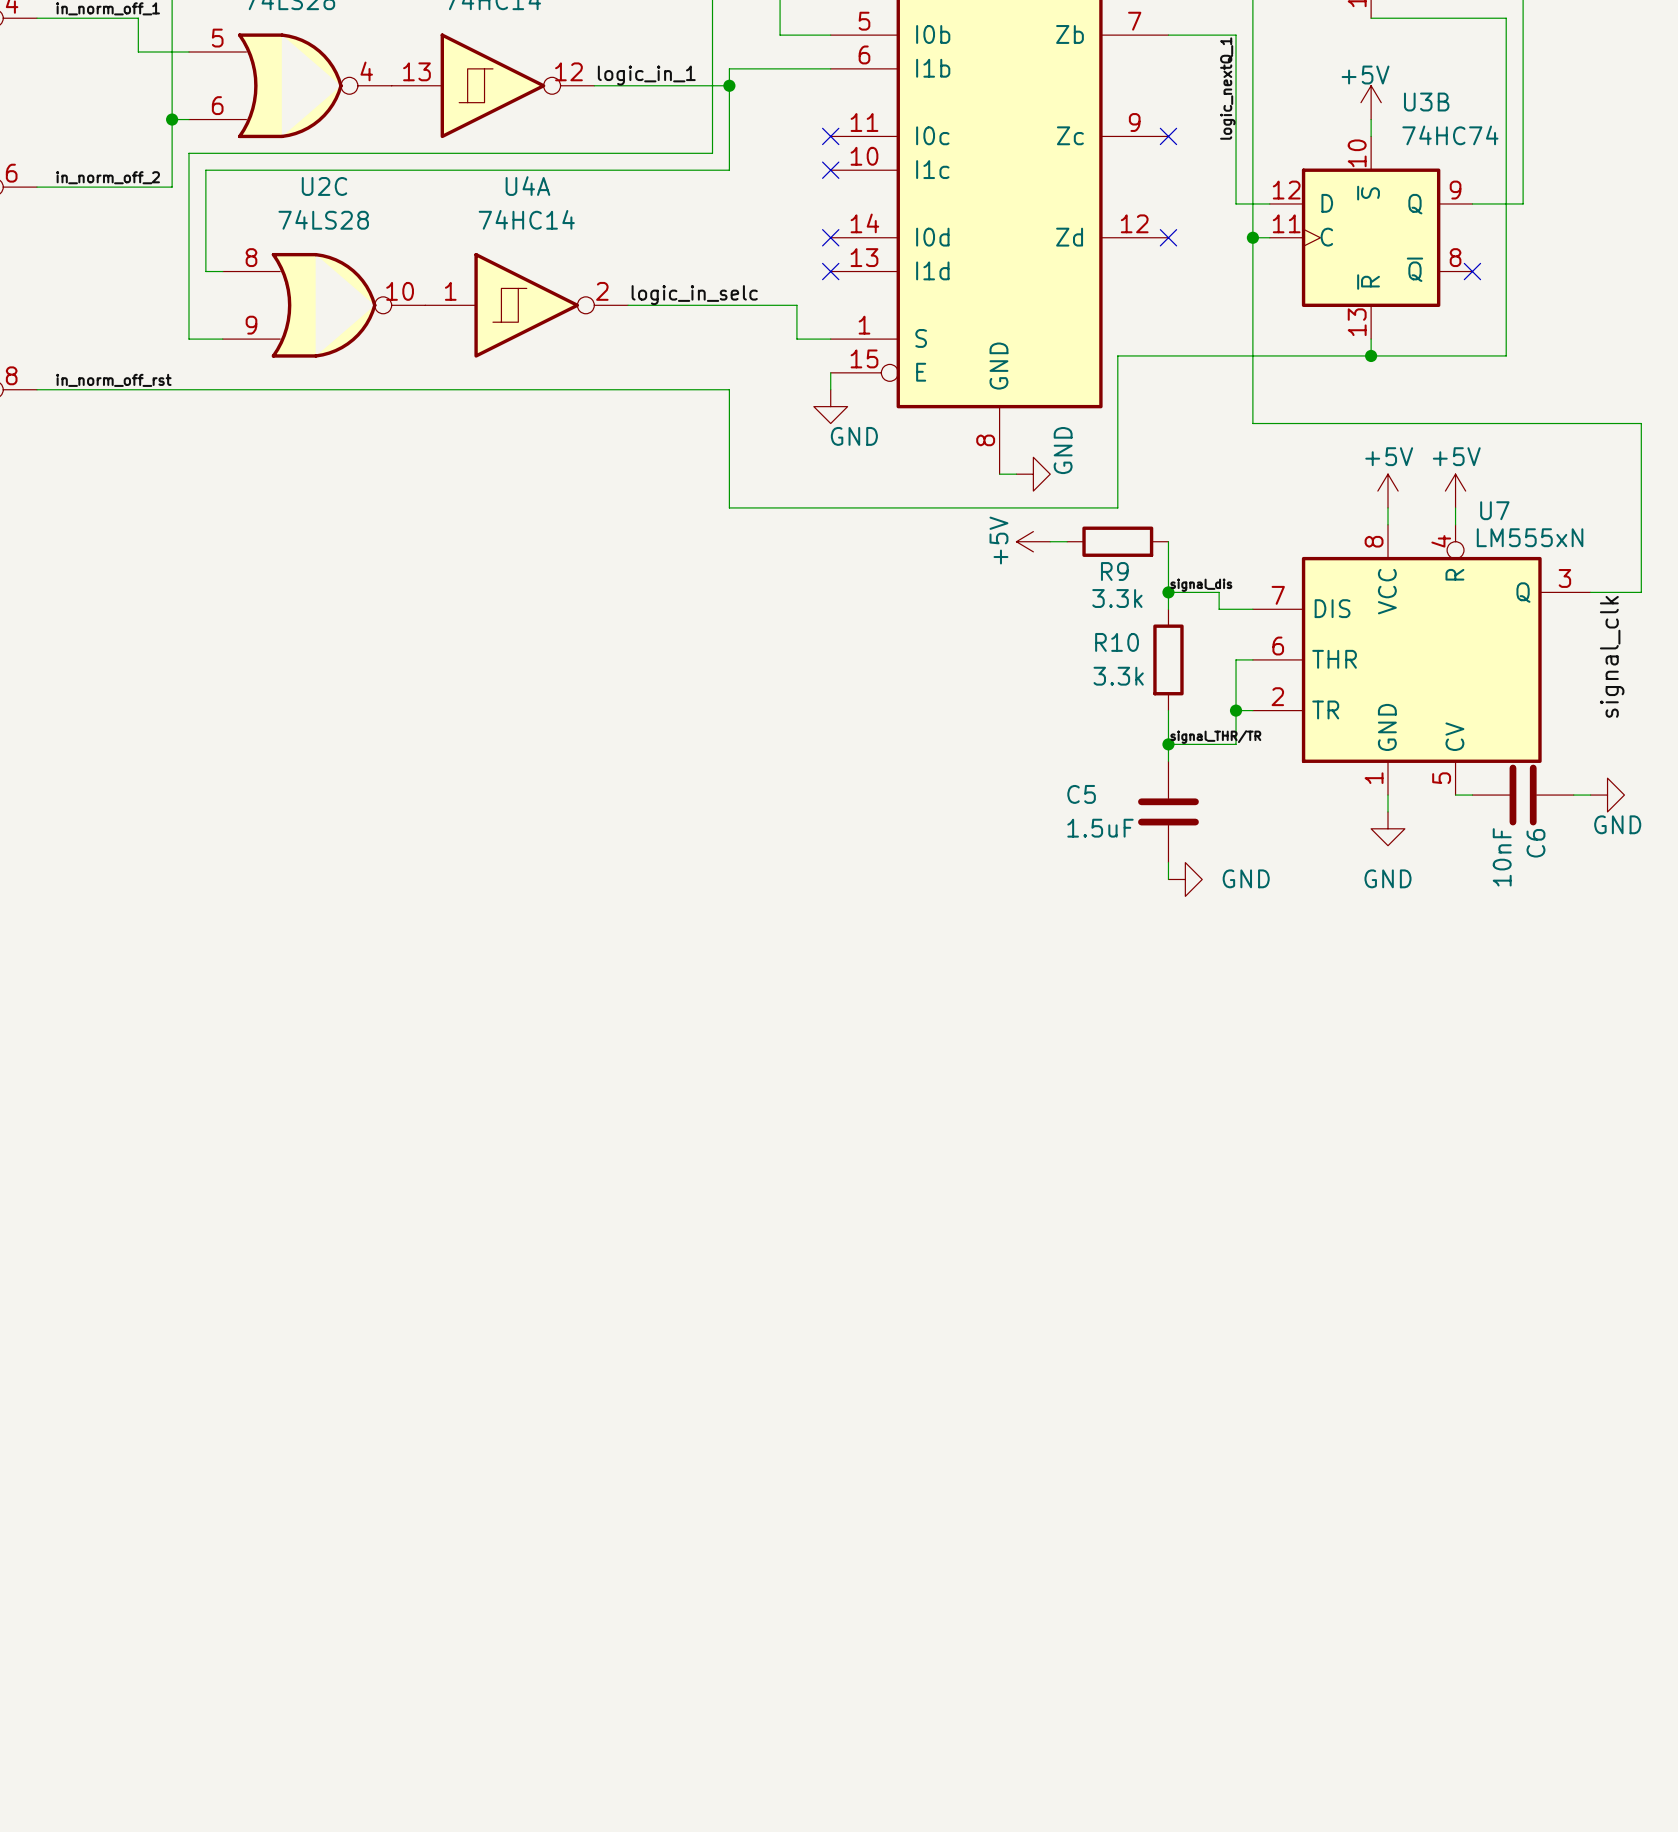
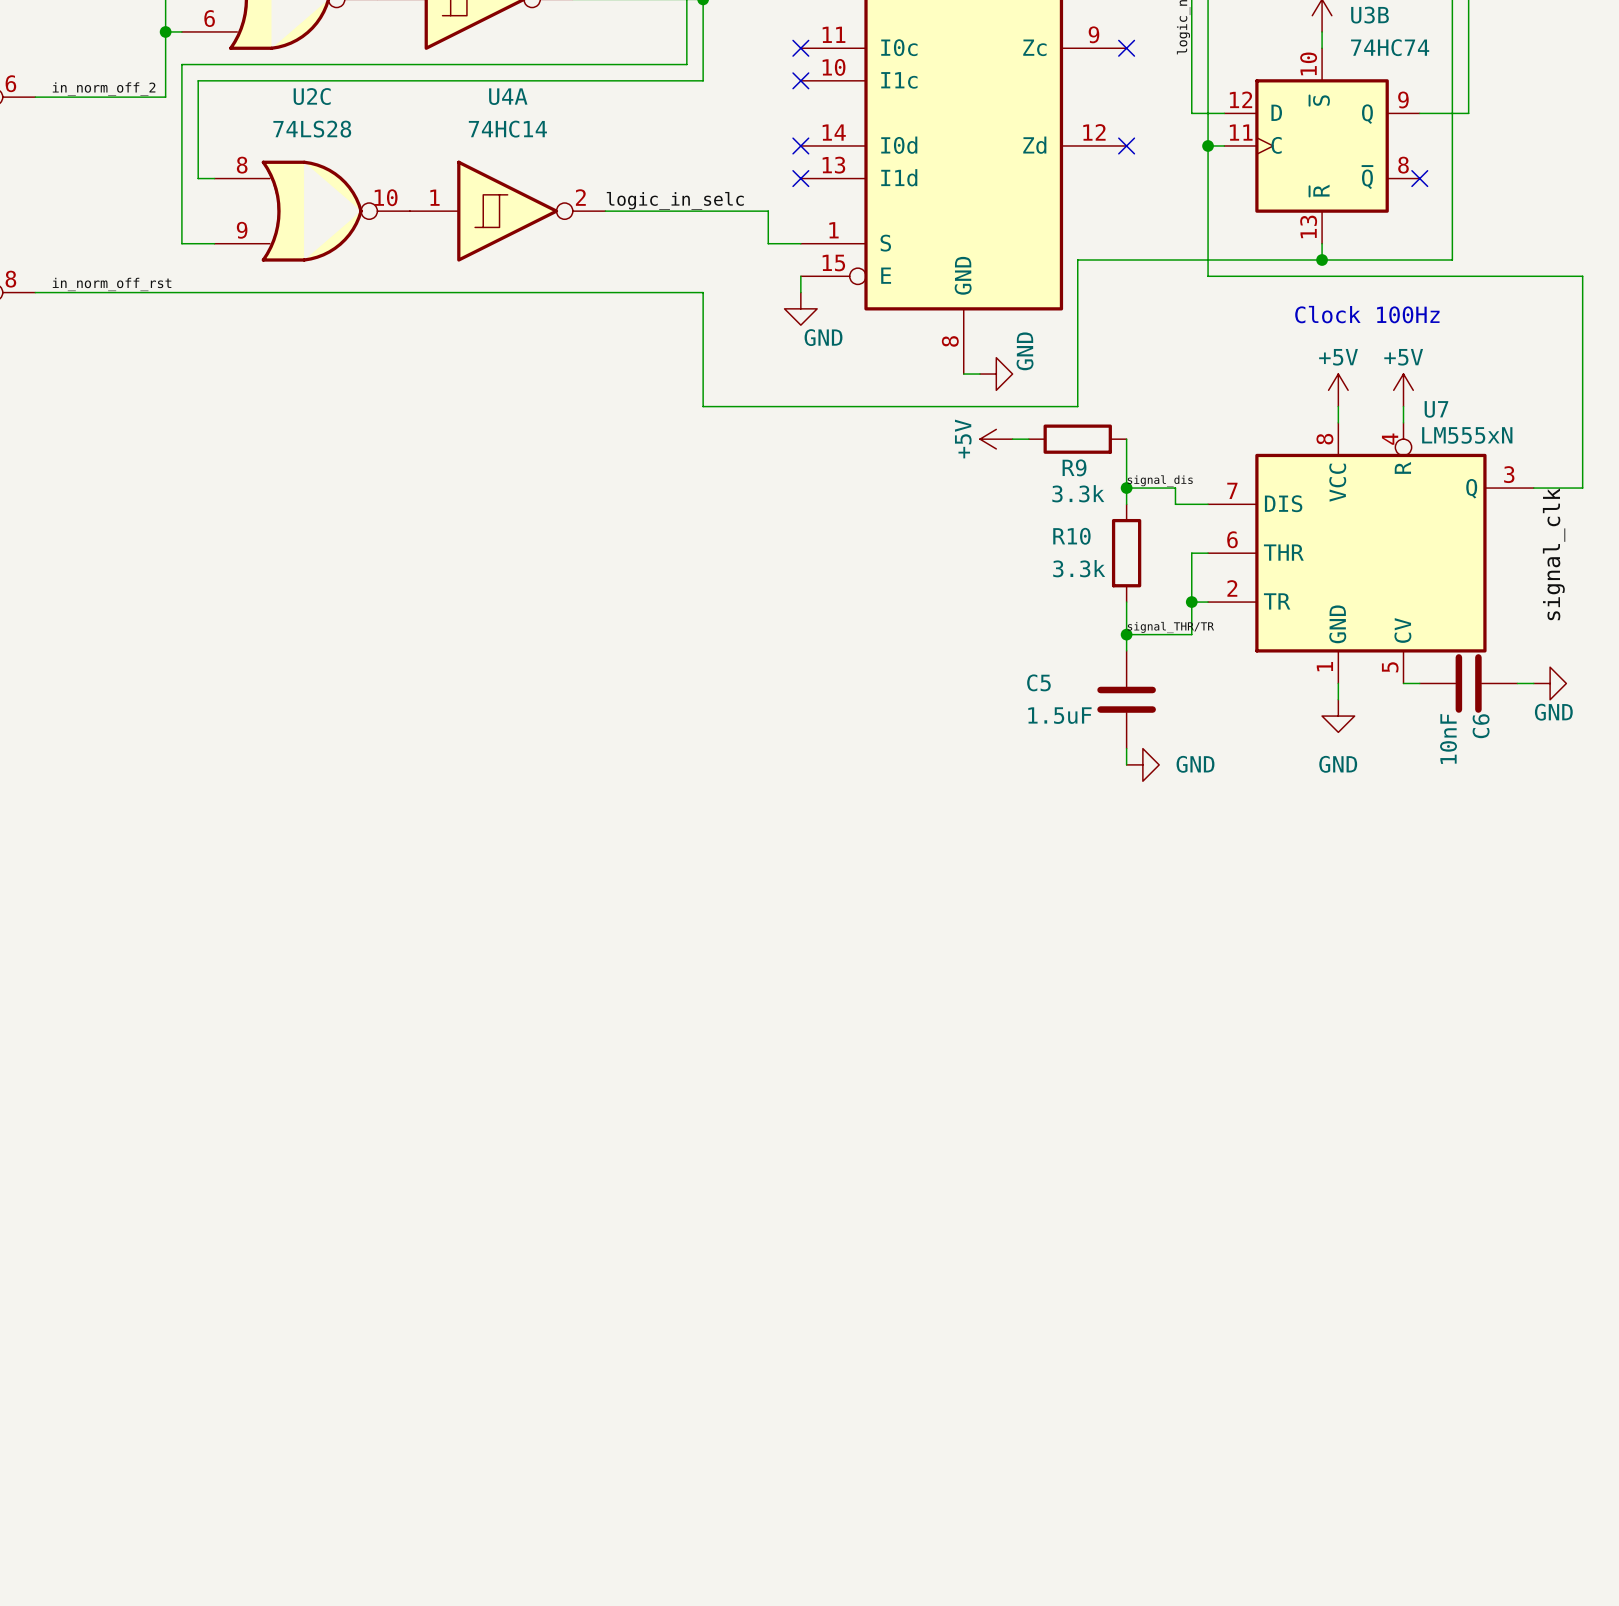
wire: (1252, 372) (1252, 423) (1641, 423) -> (1208, 276) (1582, 276) (1582, 325)
text: none -> Clock 100Hz (1367, 314)

